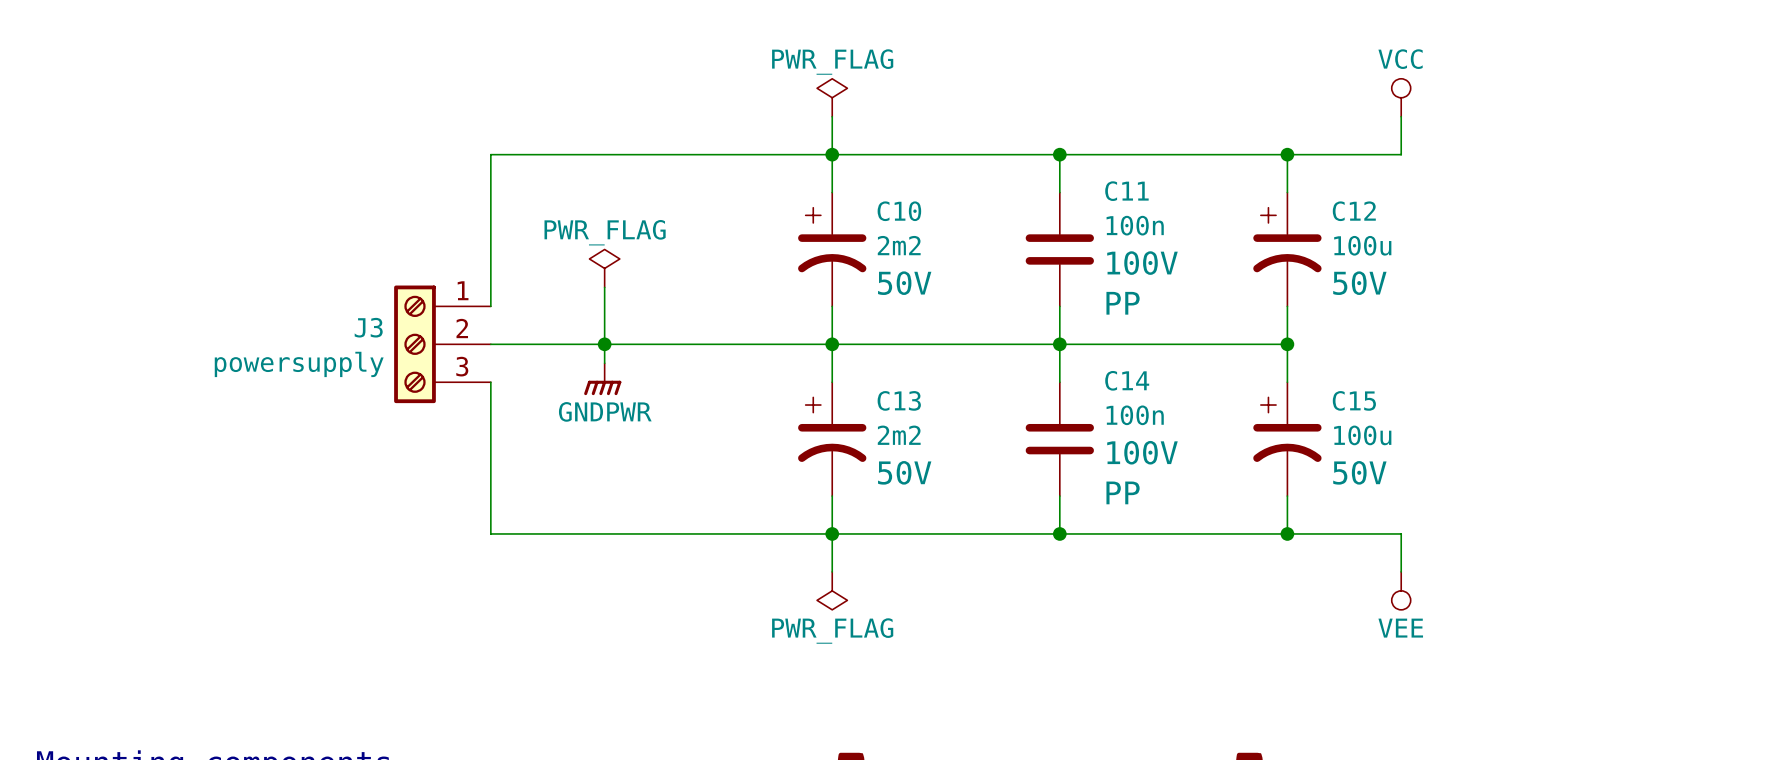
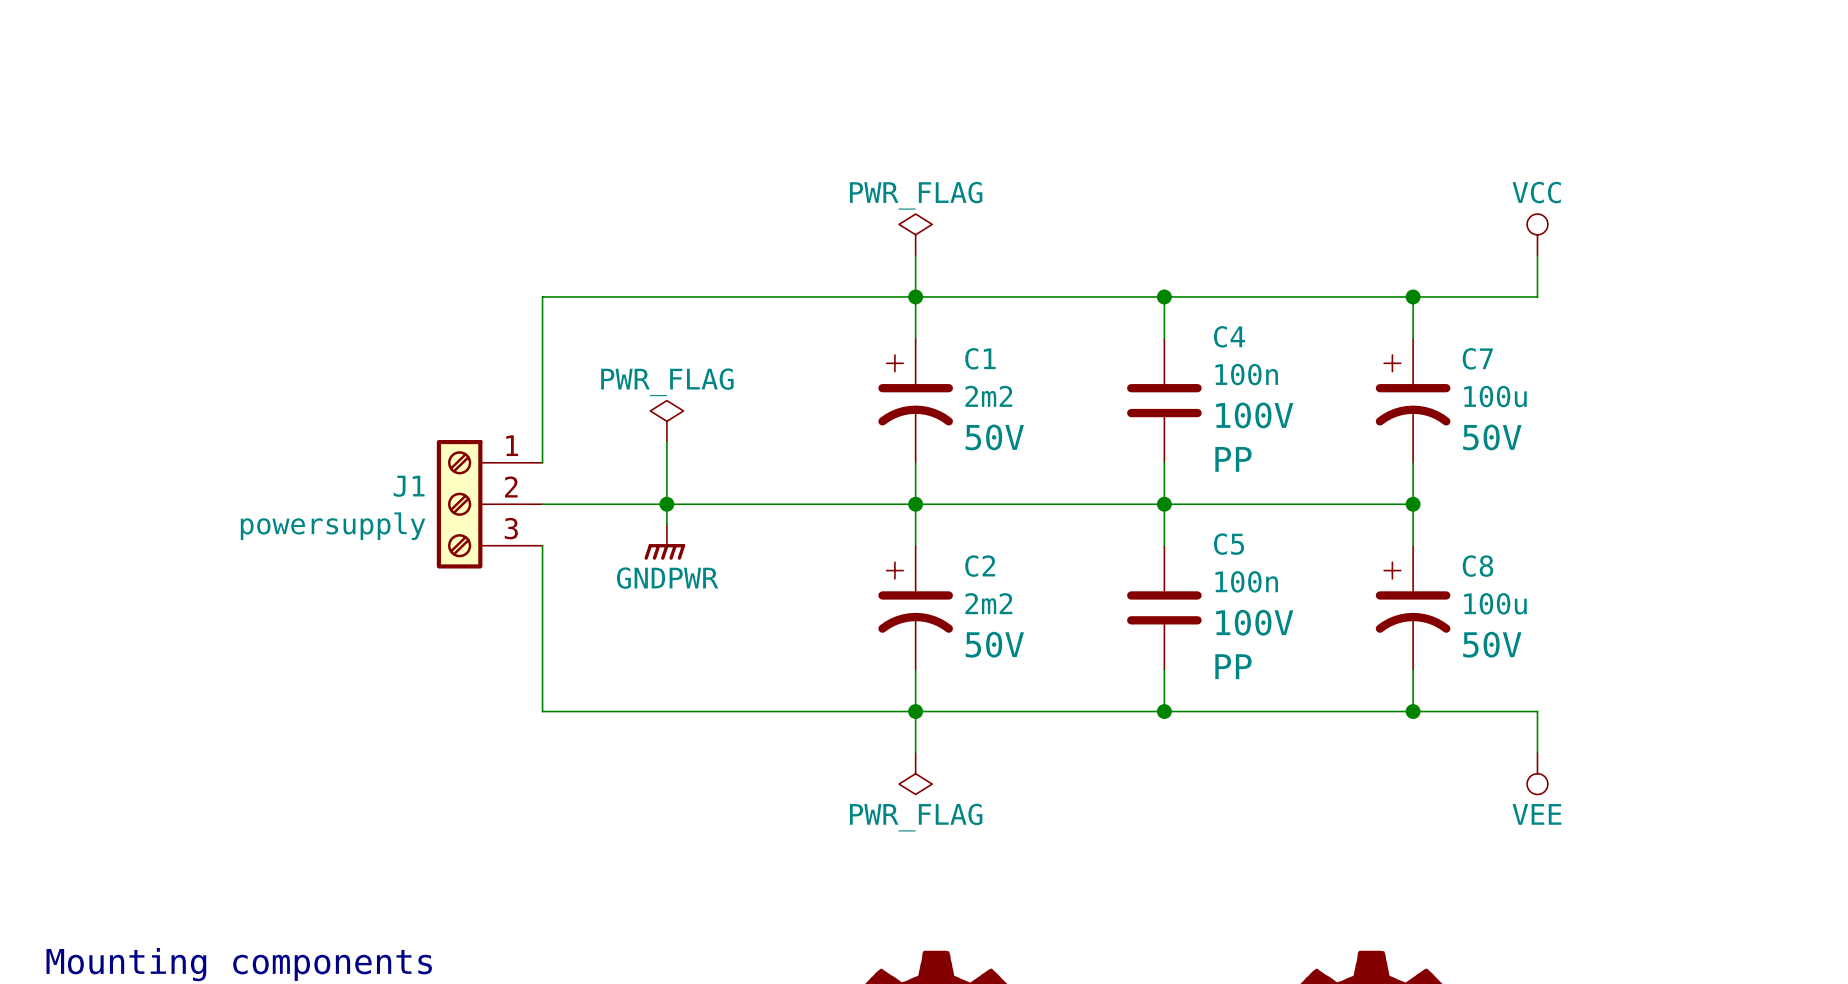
C11 name: C11 (1126, 191) -> C4 (1229, 336)
C10 name: C10 (899, 211) -> C1 (980, 358)
C12 name: C12 (1354, 211) -> C7 (1477, 358)
J3 name: J3 (368, 327) -> J1 (409, 486)
C14 name: C14 (1127, 380) -> C5 (1229, 544)
C13 name: C13 (899, 400) -> C2 (980, 566)
C15 name: C15 (1354, 400) -> C8 (1477, 566)

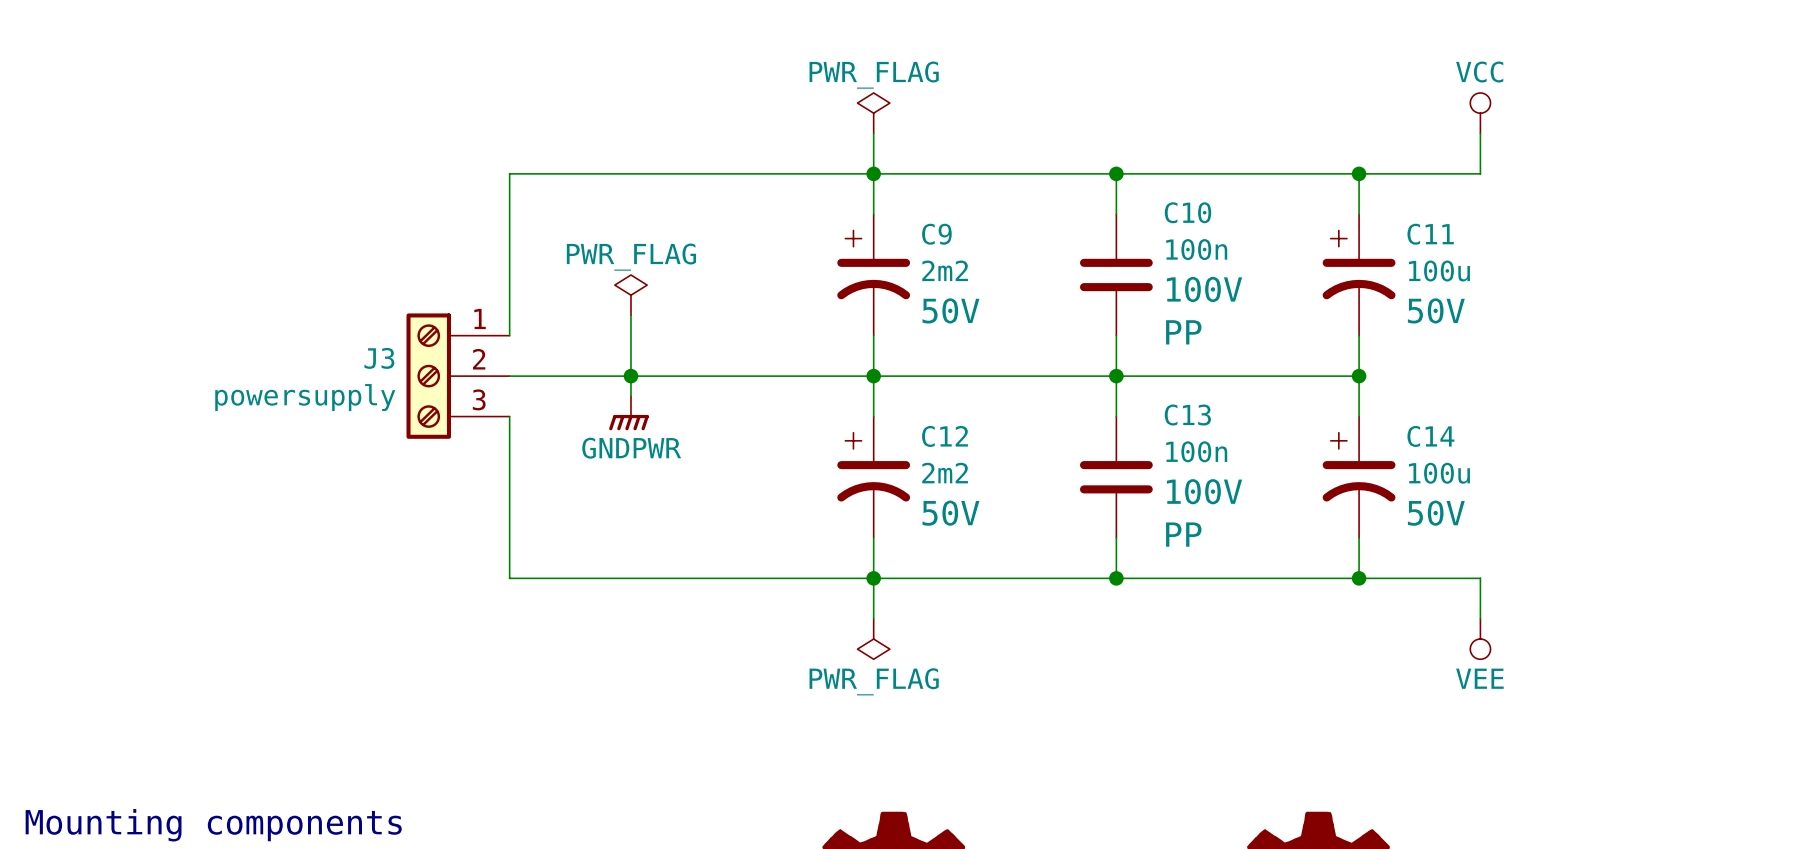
C4 name: C4 (1229, 336) -> C10 (1187, 212)
C1 name: C1 (980, 358) -> C9 (936, 234)
C7 name: C7 (1477, 358) -> C11 (1430, 234)
J1 name: J1 (409, 486) -> J3 (379, 358)
C5 name: C5 (1229, 544) -> C13 (1187, 415)
C2 name: C2 (980, 566) -> C12 (945, 436)
C8 name: C8 (1477, 566) -> C14 (1430, 436)

